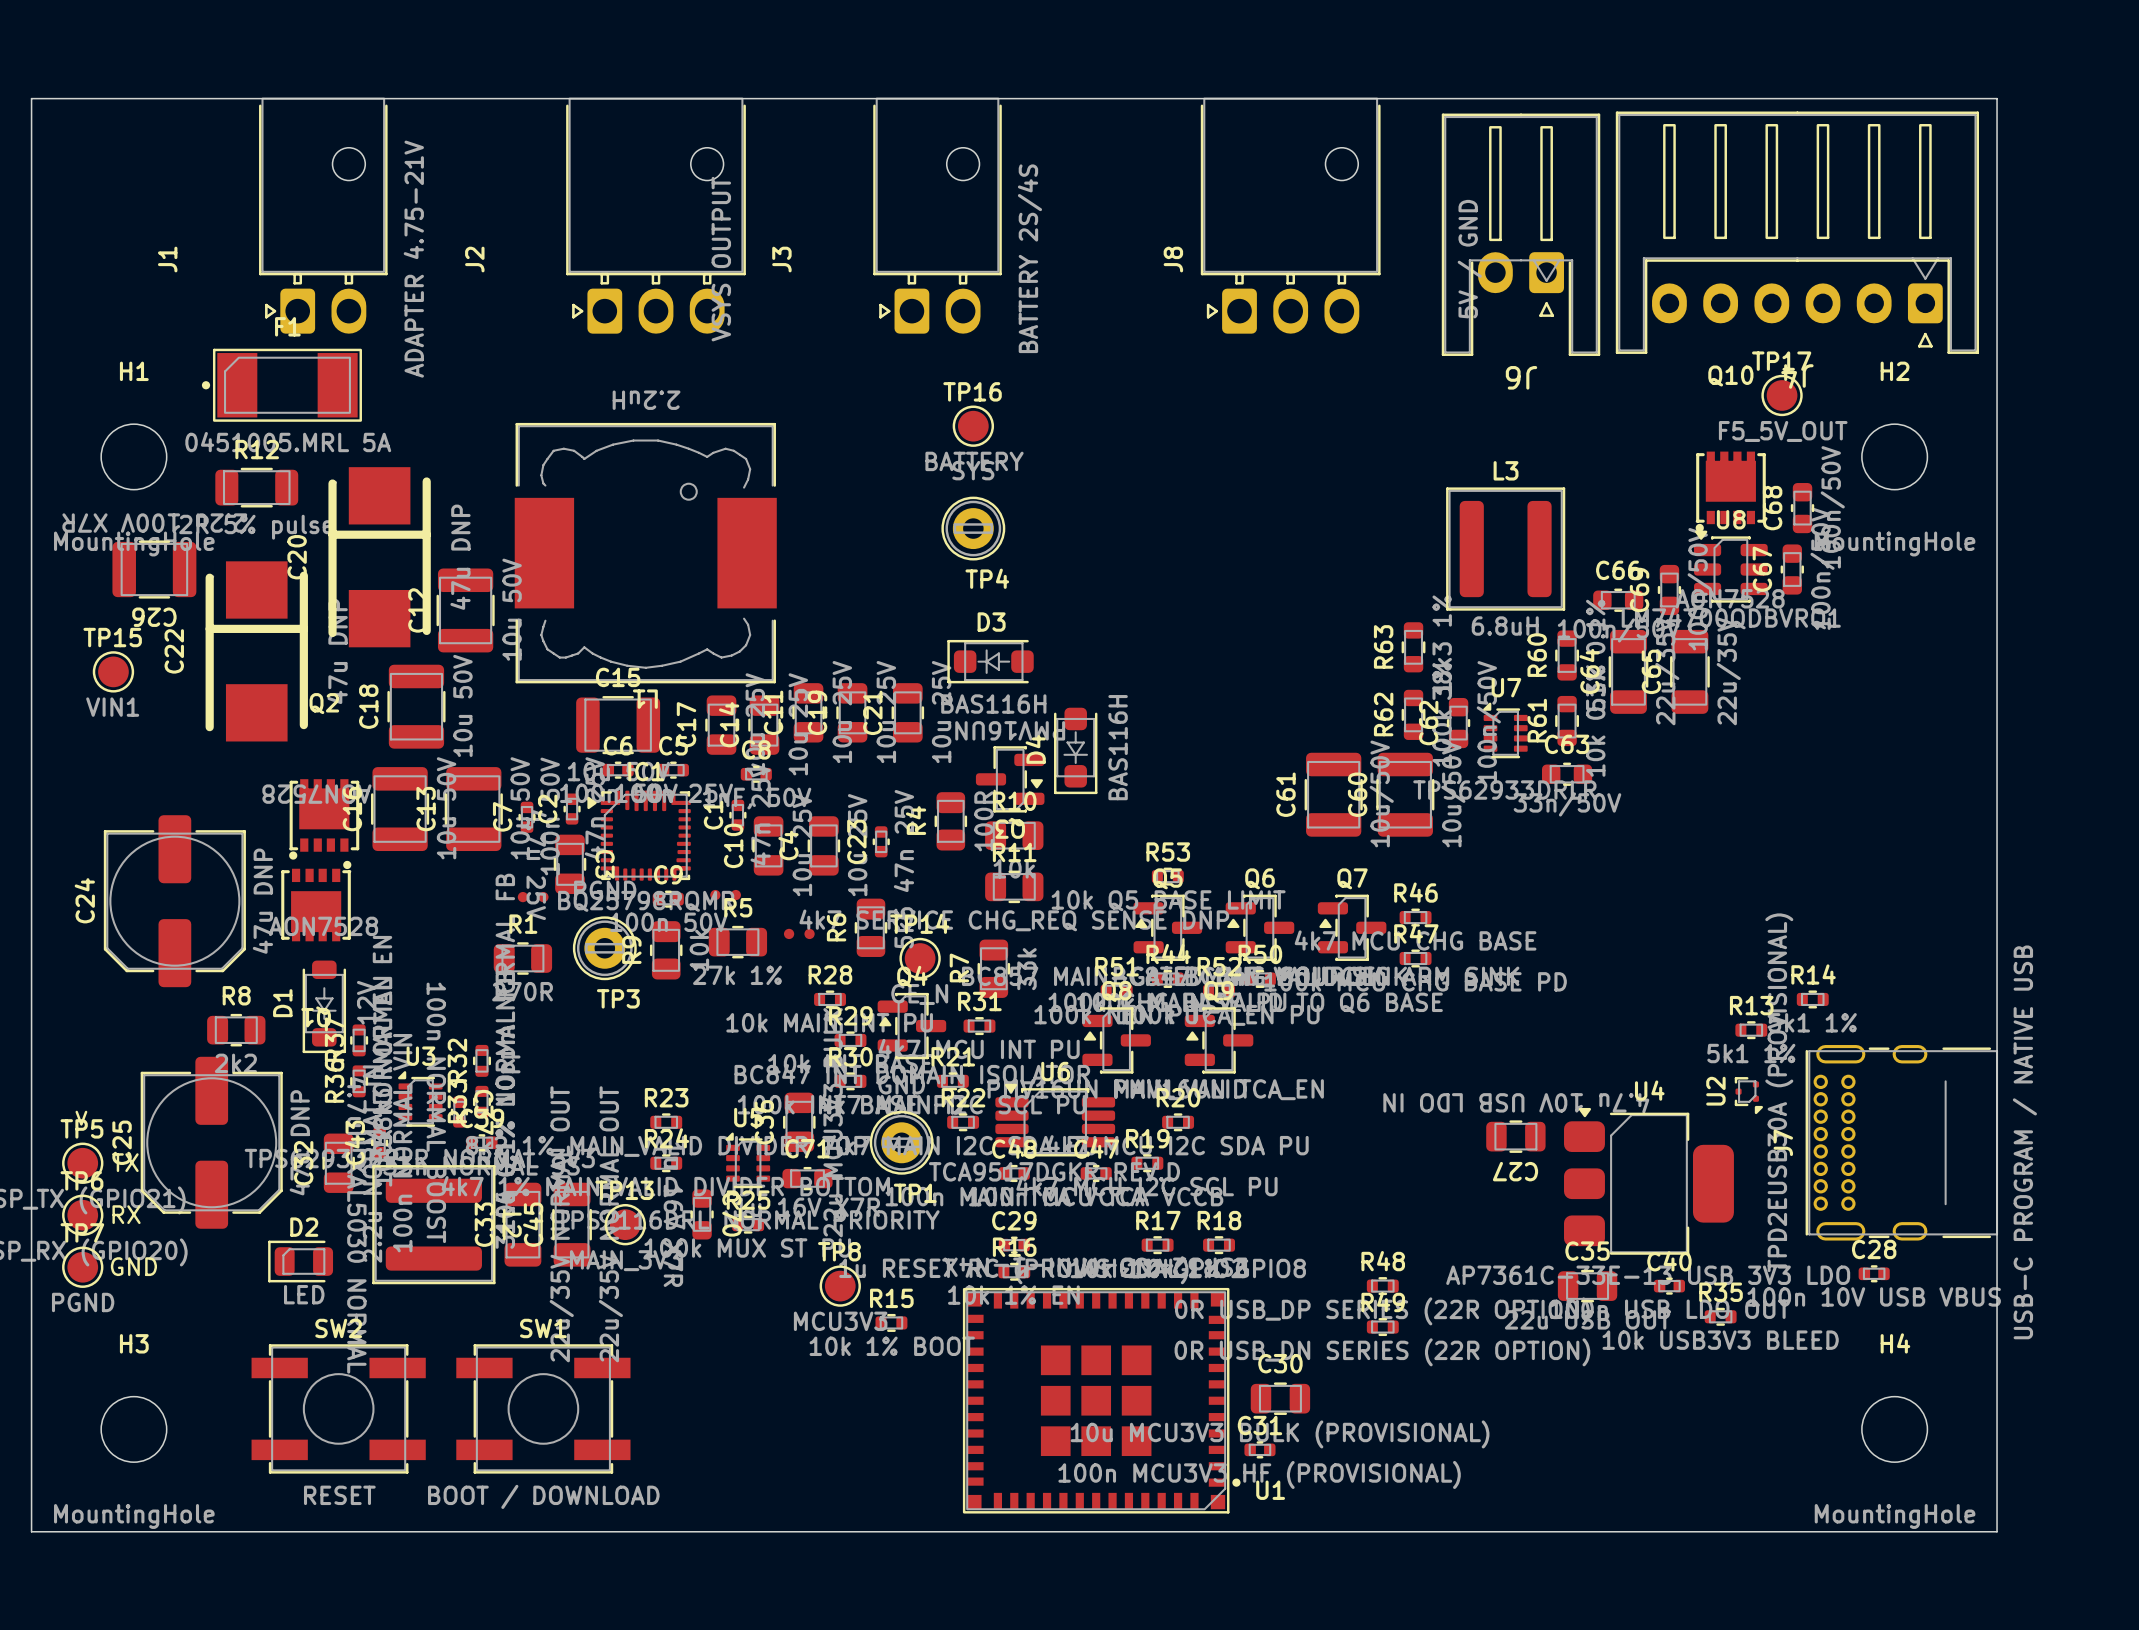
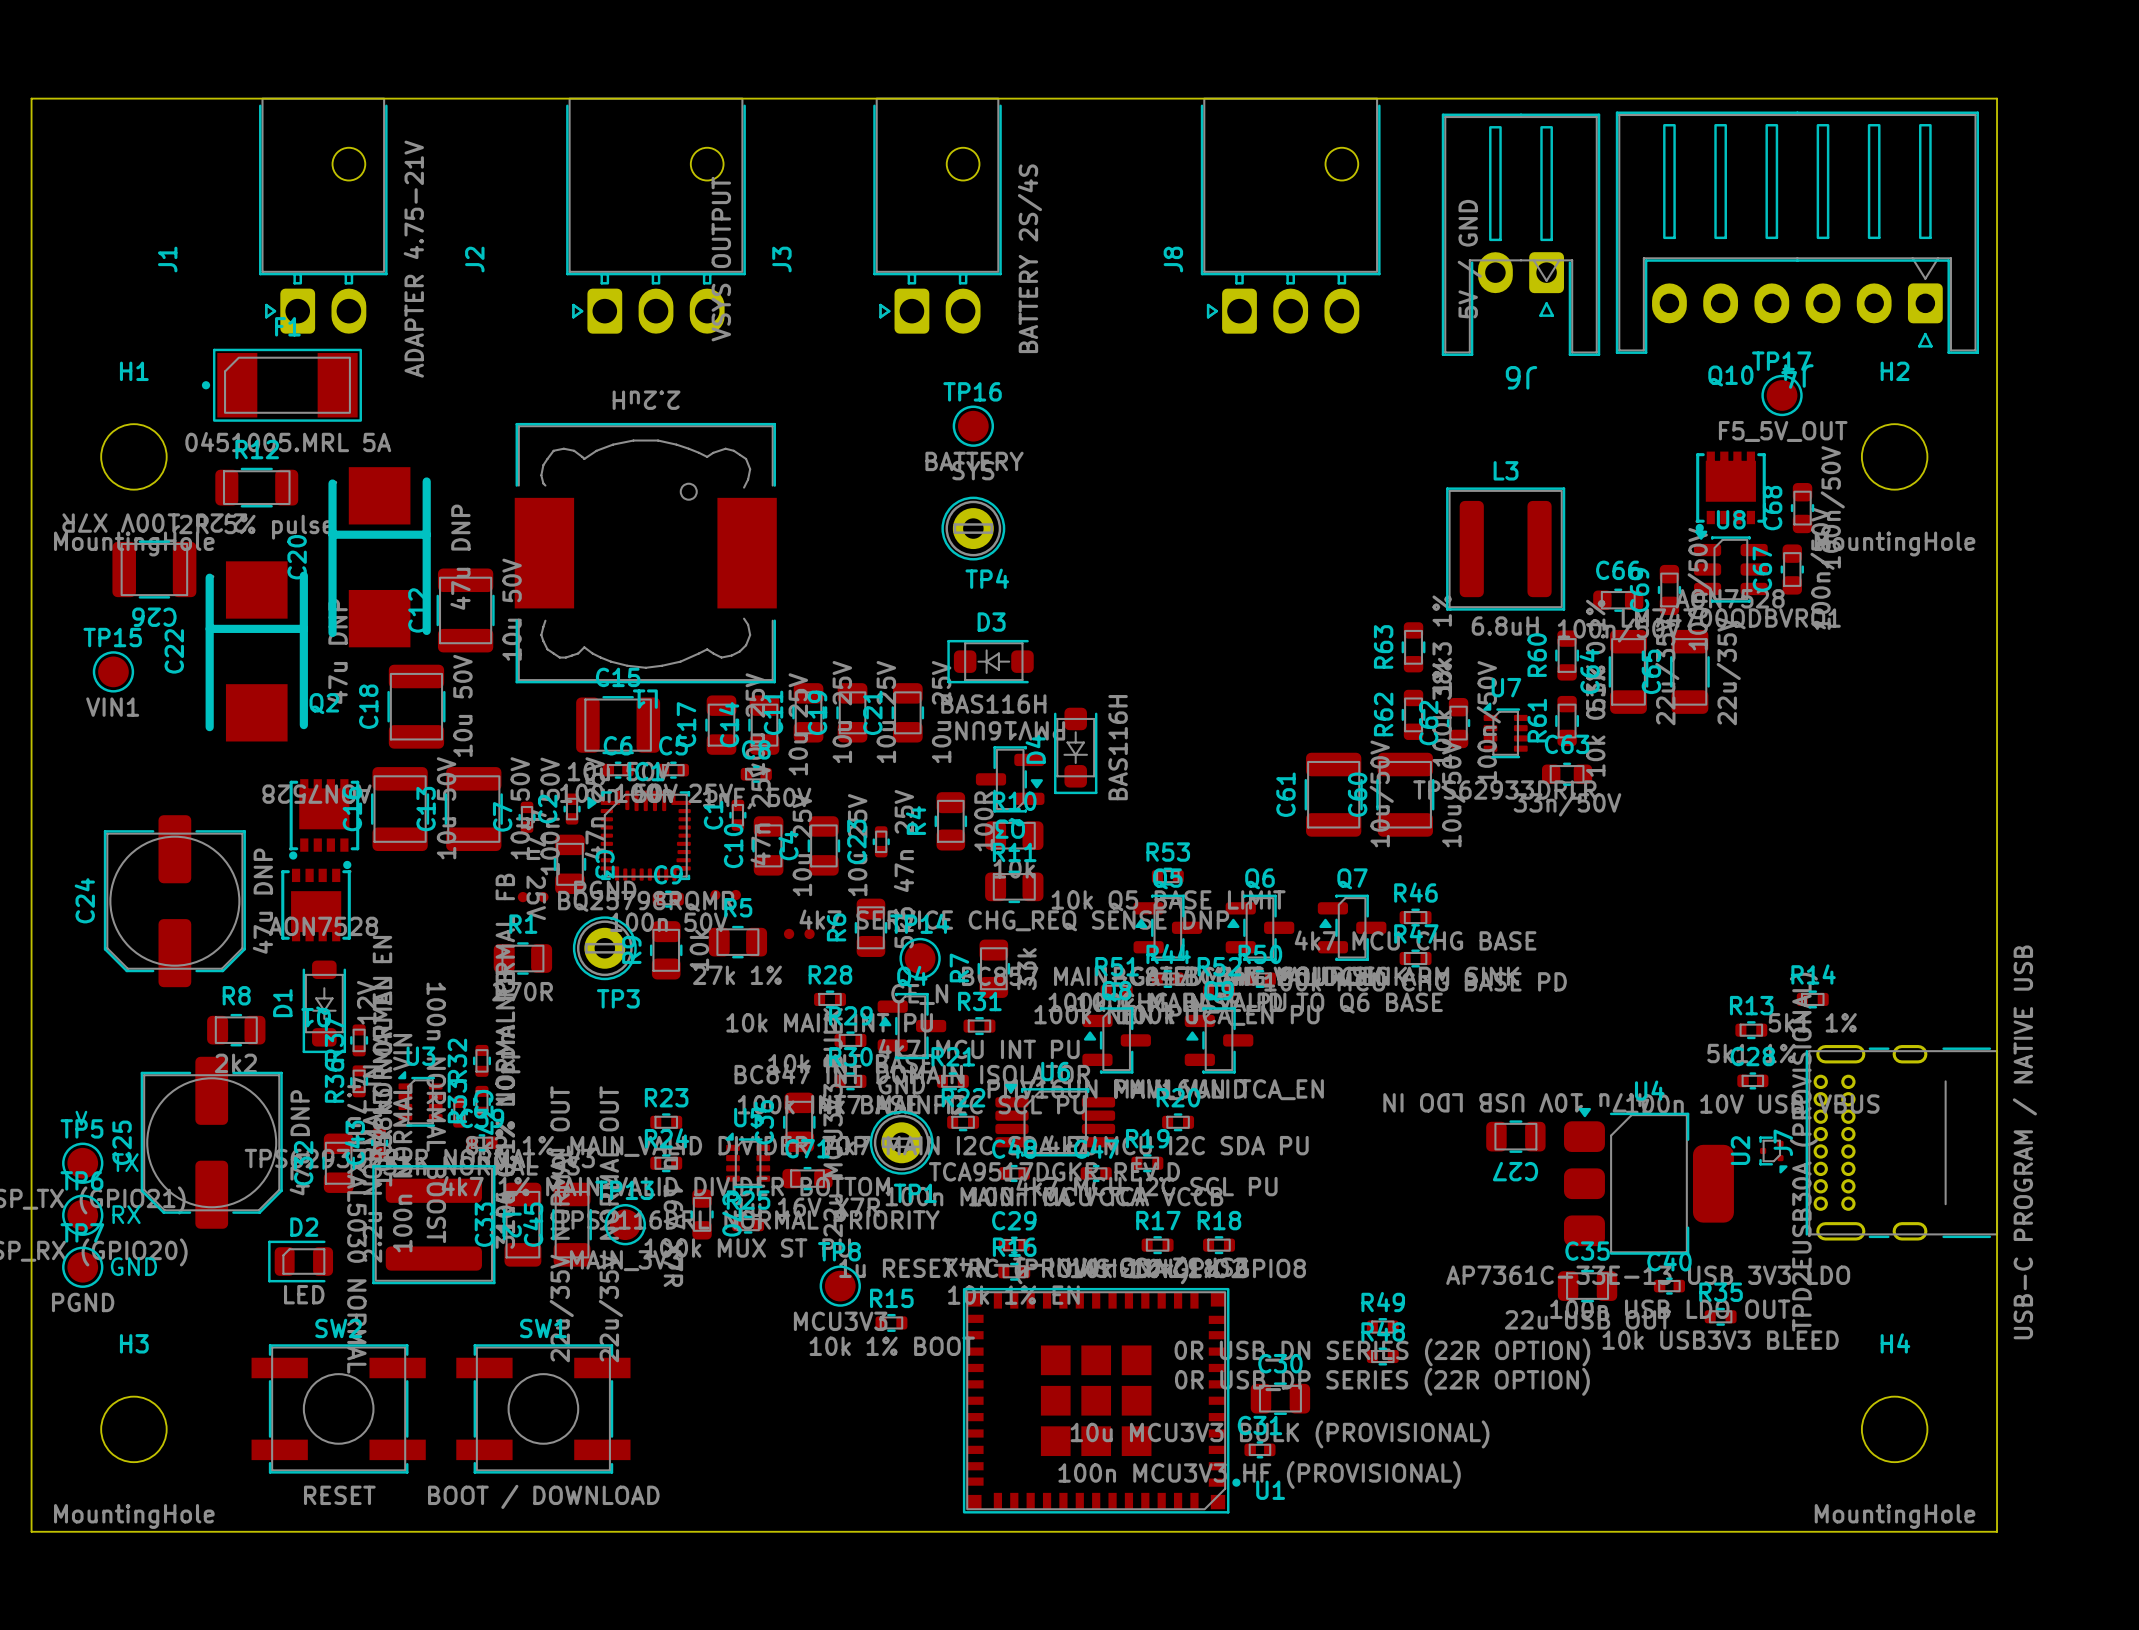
U2 position: (1748, 1095) -> (1773, 1154)
C28 position: (1874, 1273) -> (1752, 1080)
R48 position: (1382, 1286) -> (1382, 1356)

